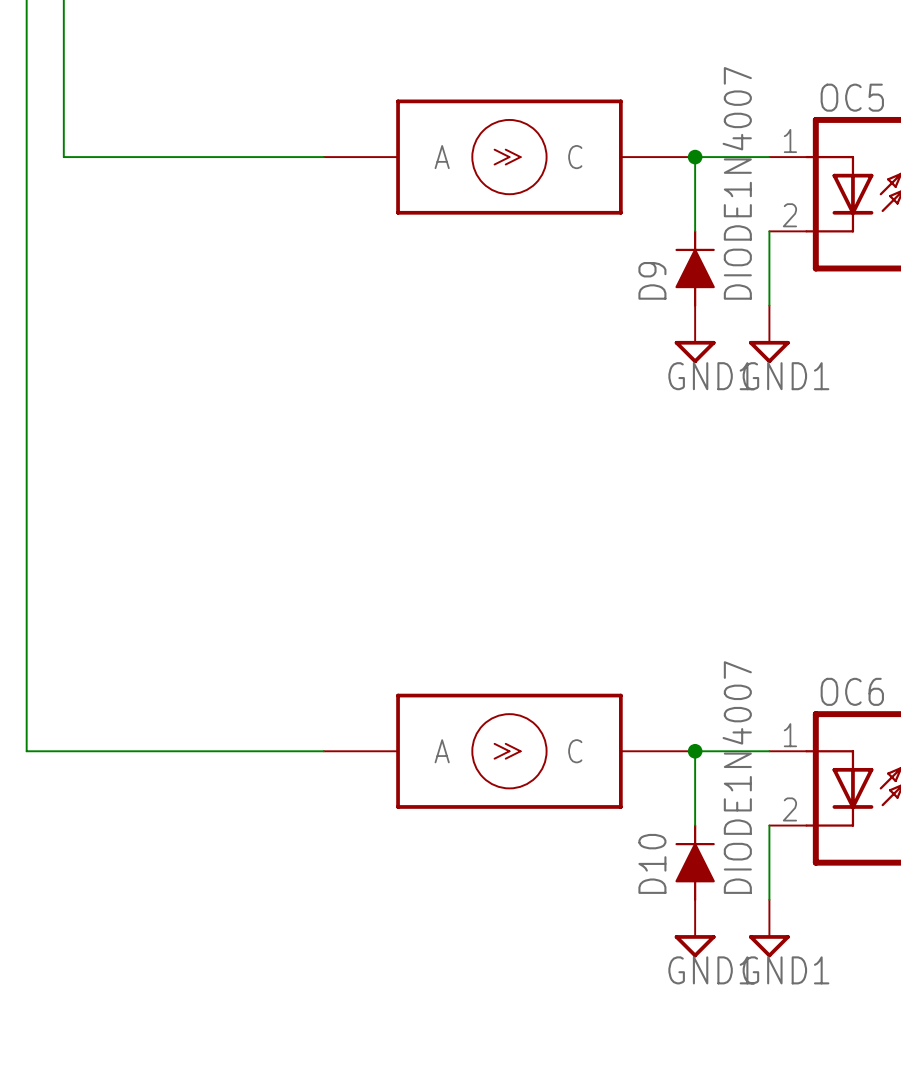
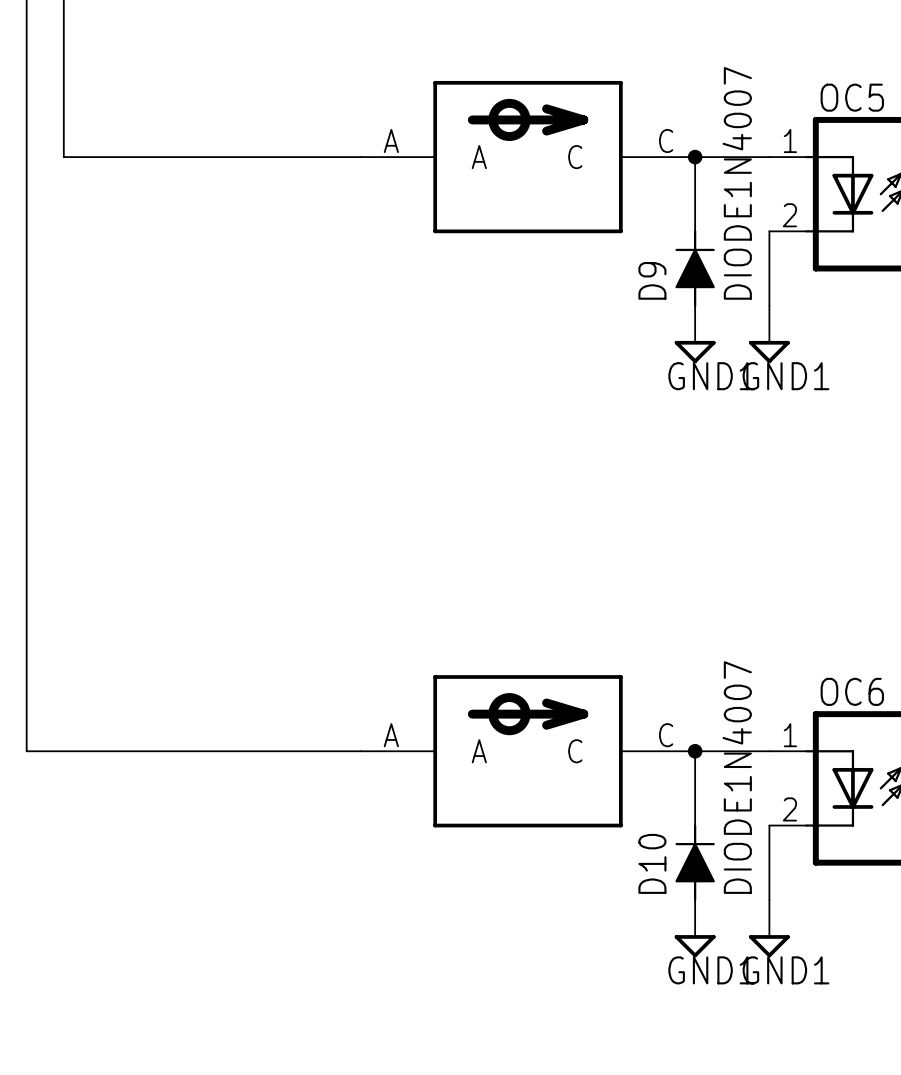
part: (509, 157) -> none
part: none -> (528, 157)
part: (509, 751) -> none
part: none -> (528, 751)

